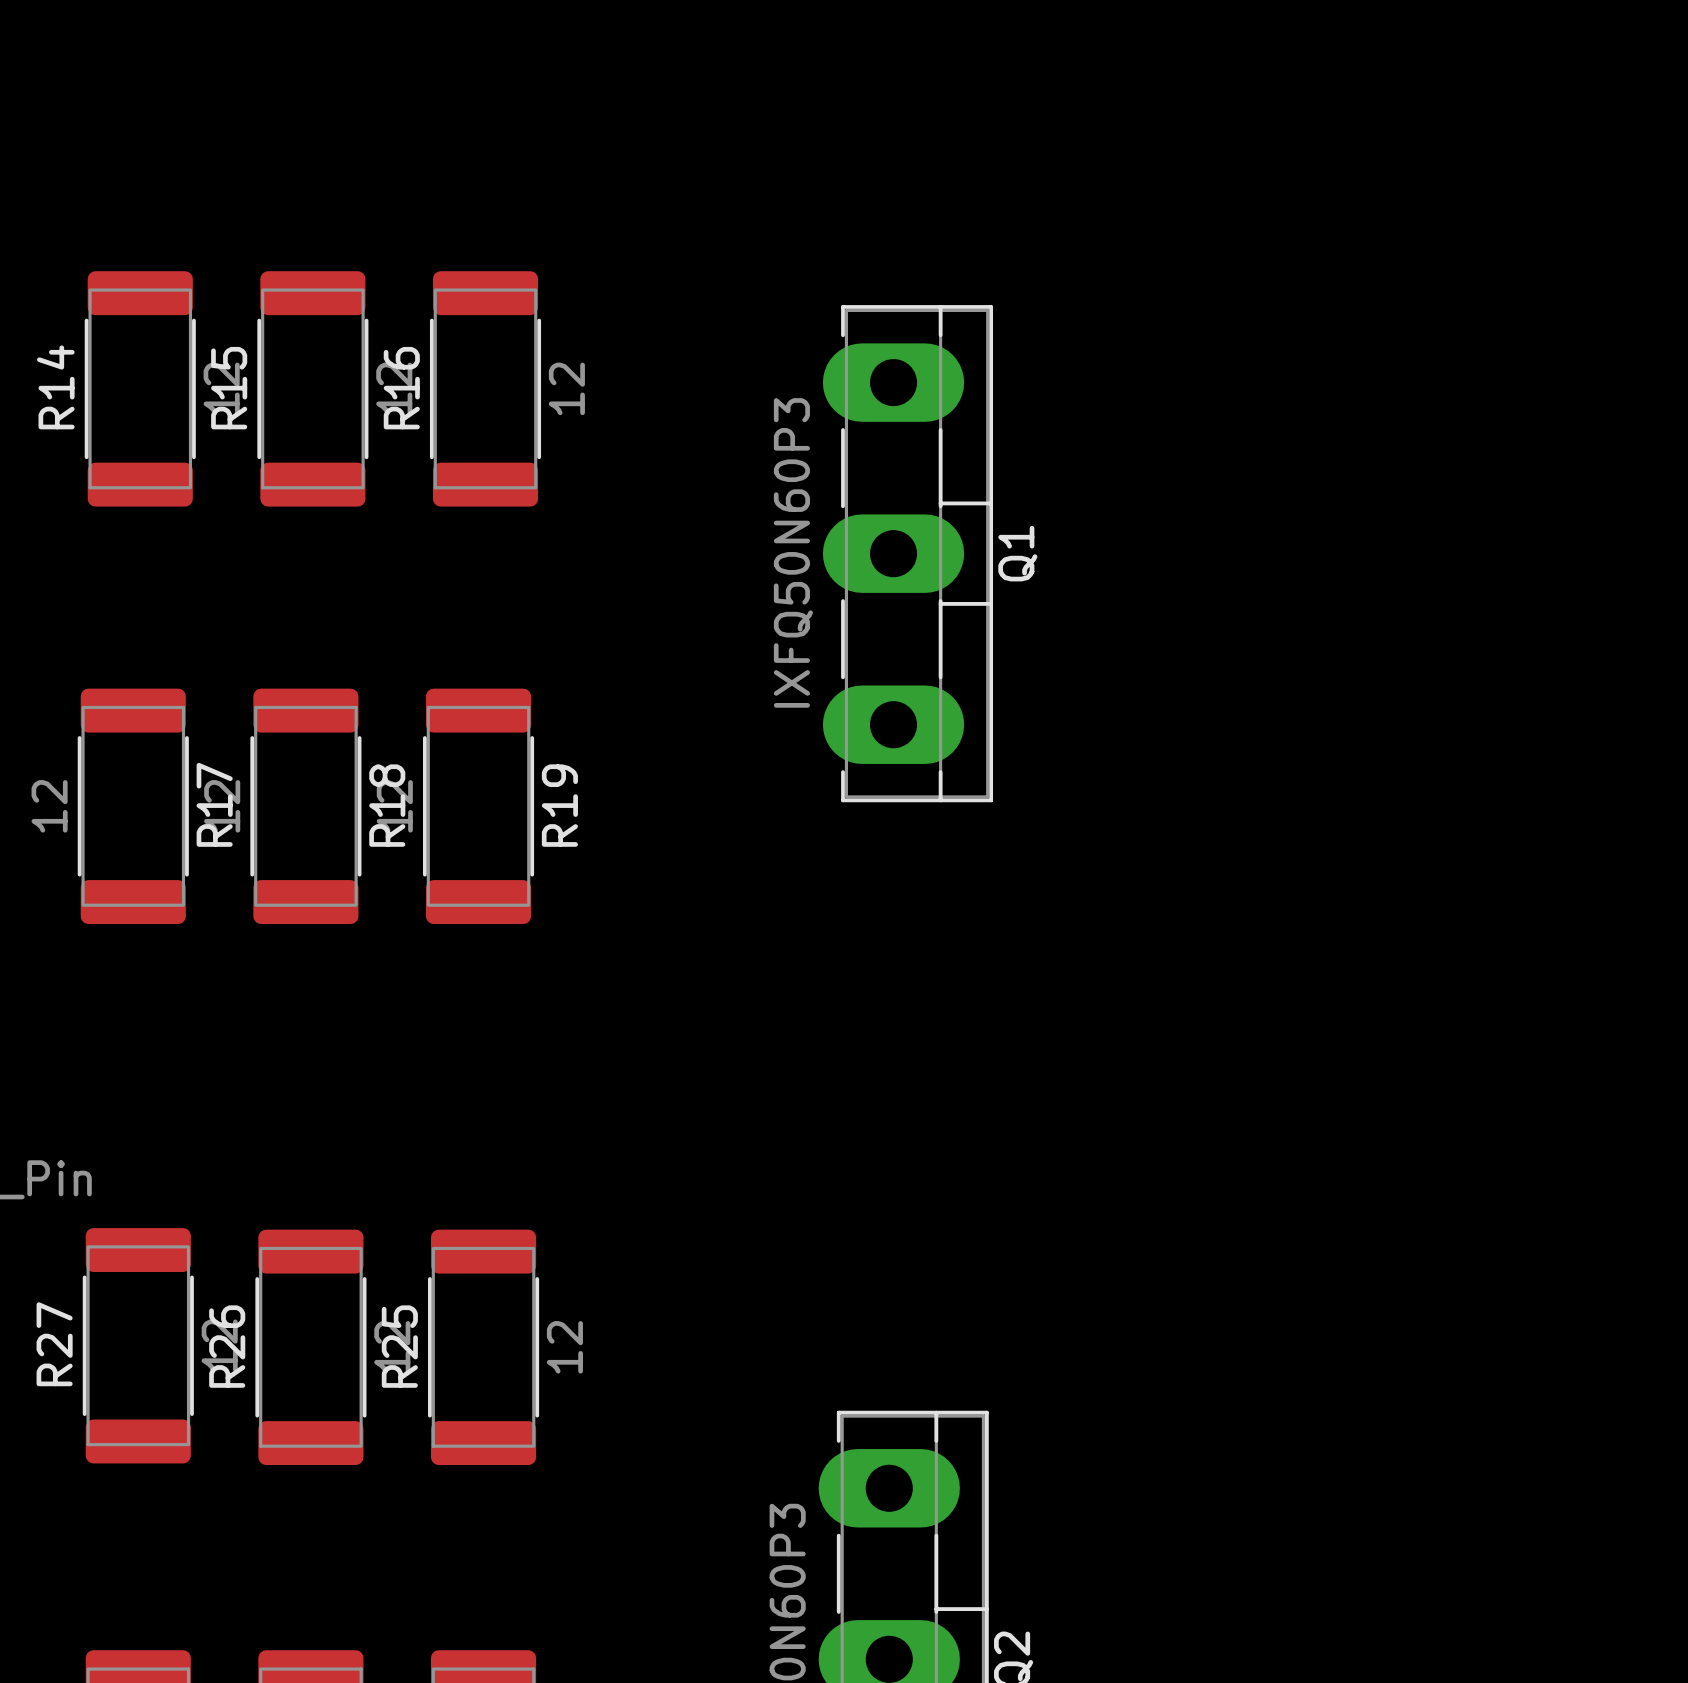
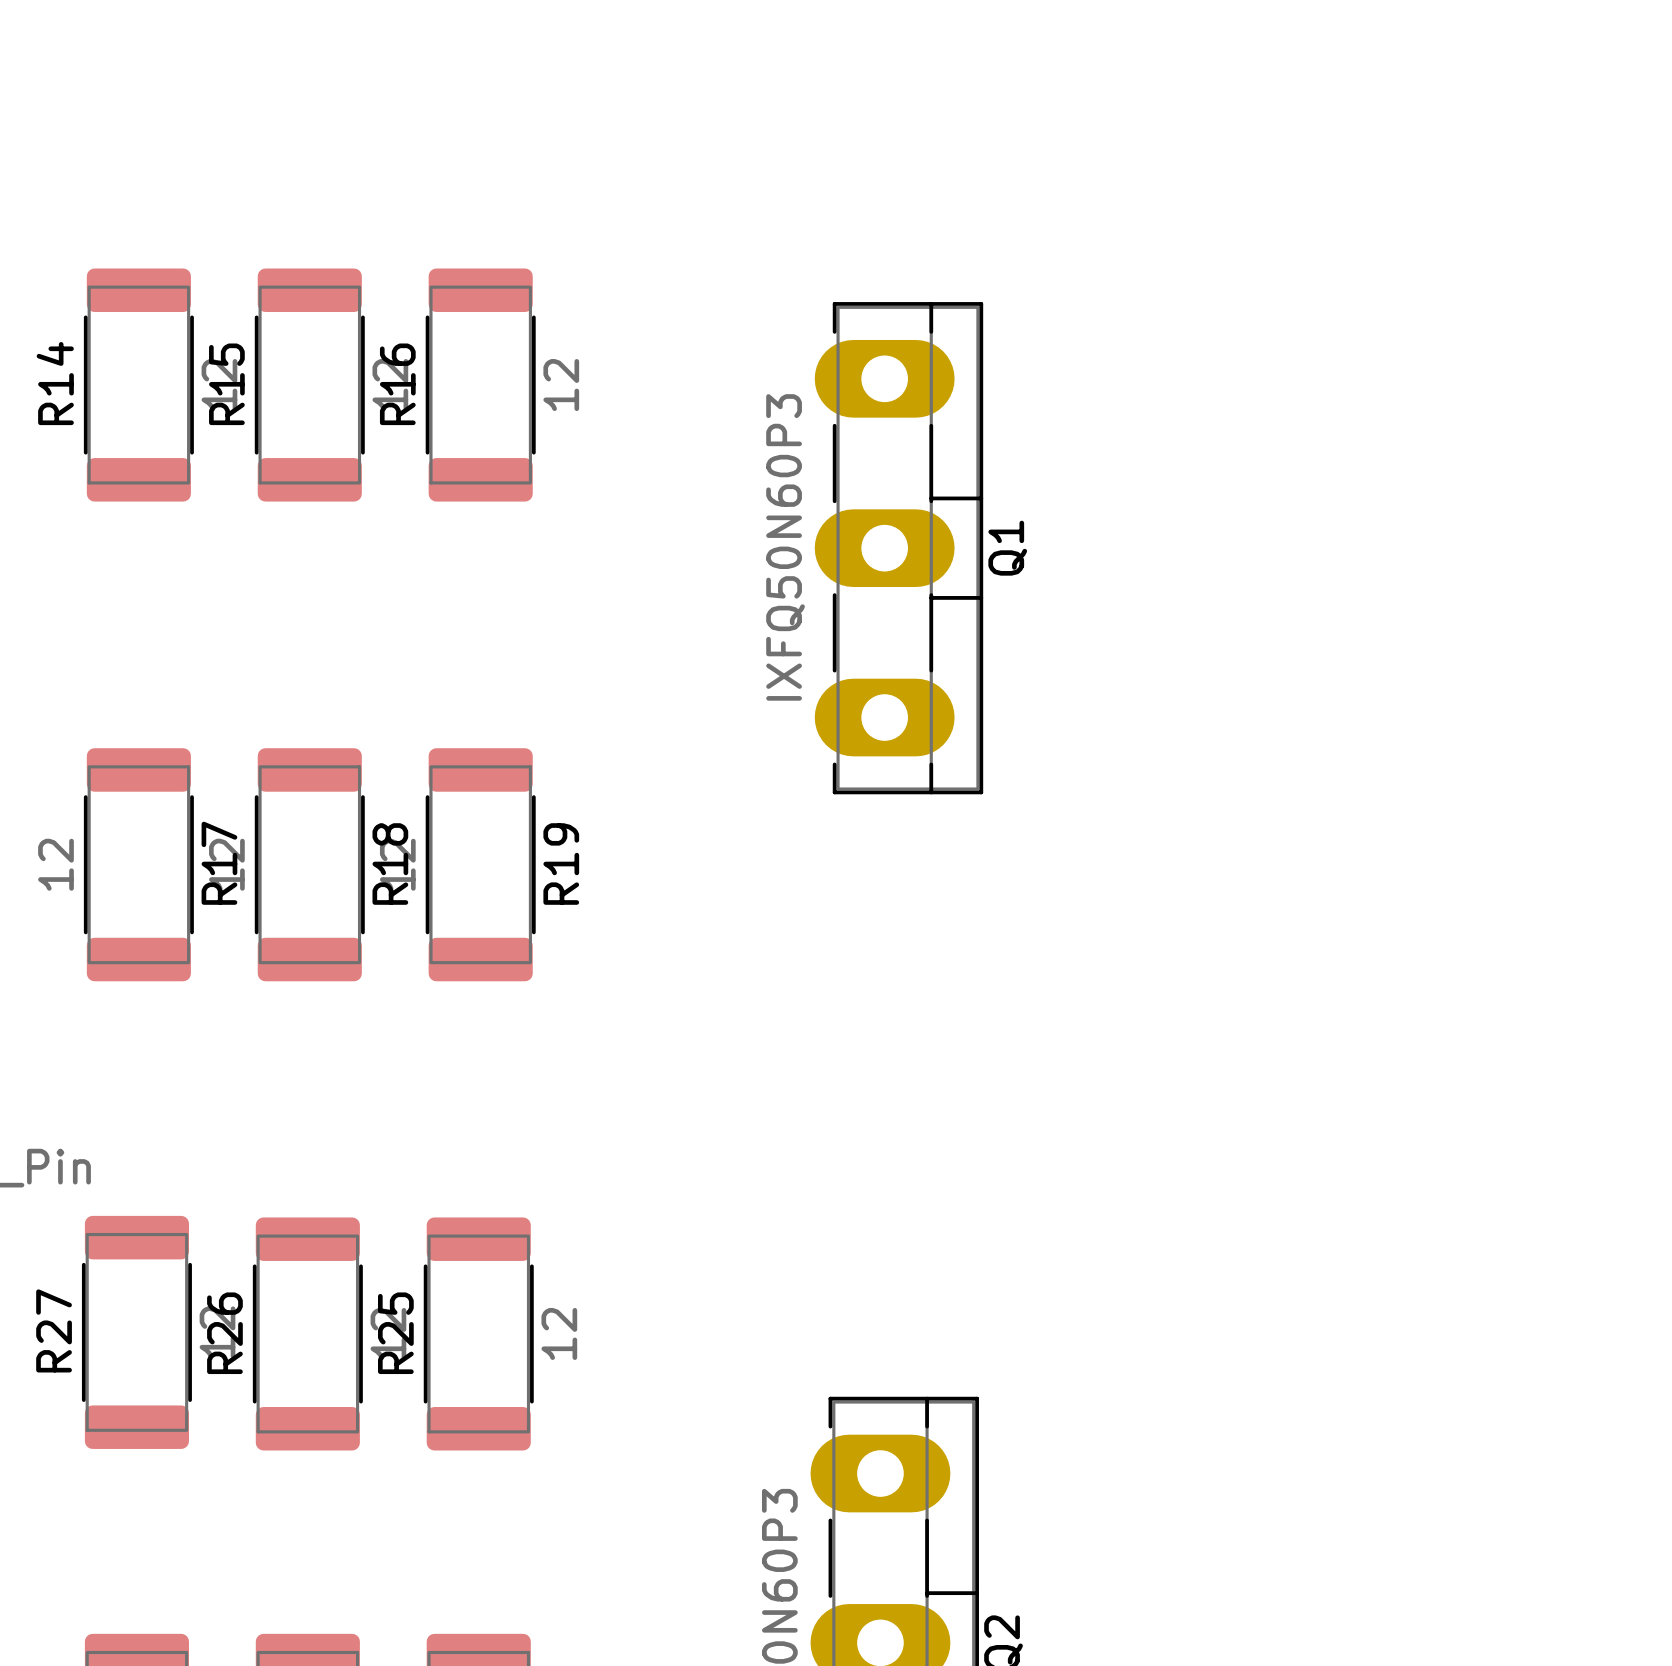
R17 position: (133, 806) -> (138, 864)
R18 position: (305, 806) -> (309, 864)
R19 position: (478, 806) -> (480, 864)

